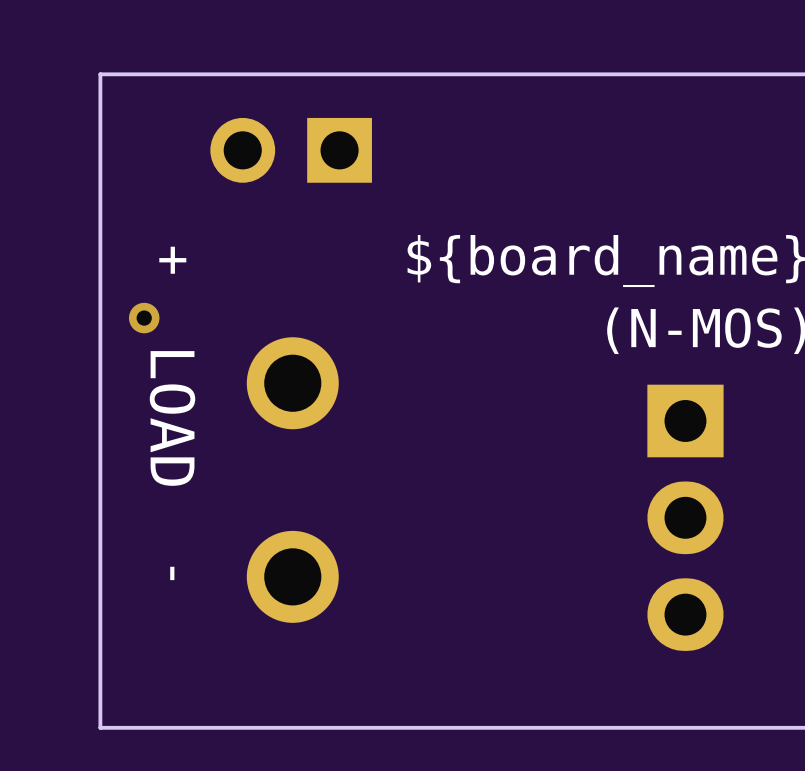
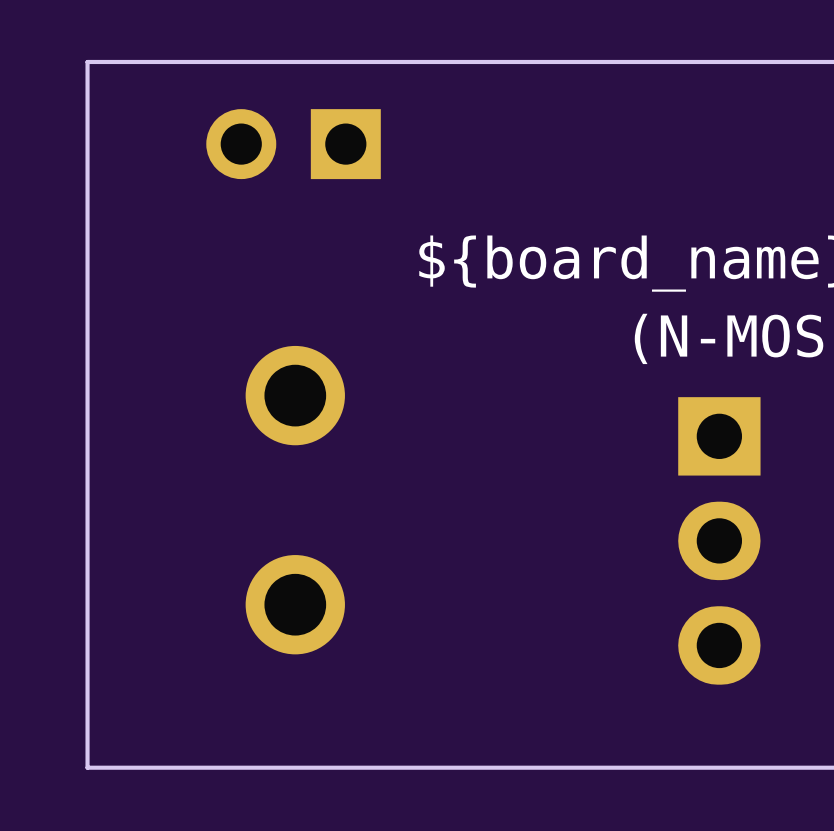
text: + (172, 260) -> none
via: (144, 318) -> none
text: LOAD (172, 418) -> none
text: - (172, 573) -> none

